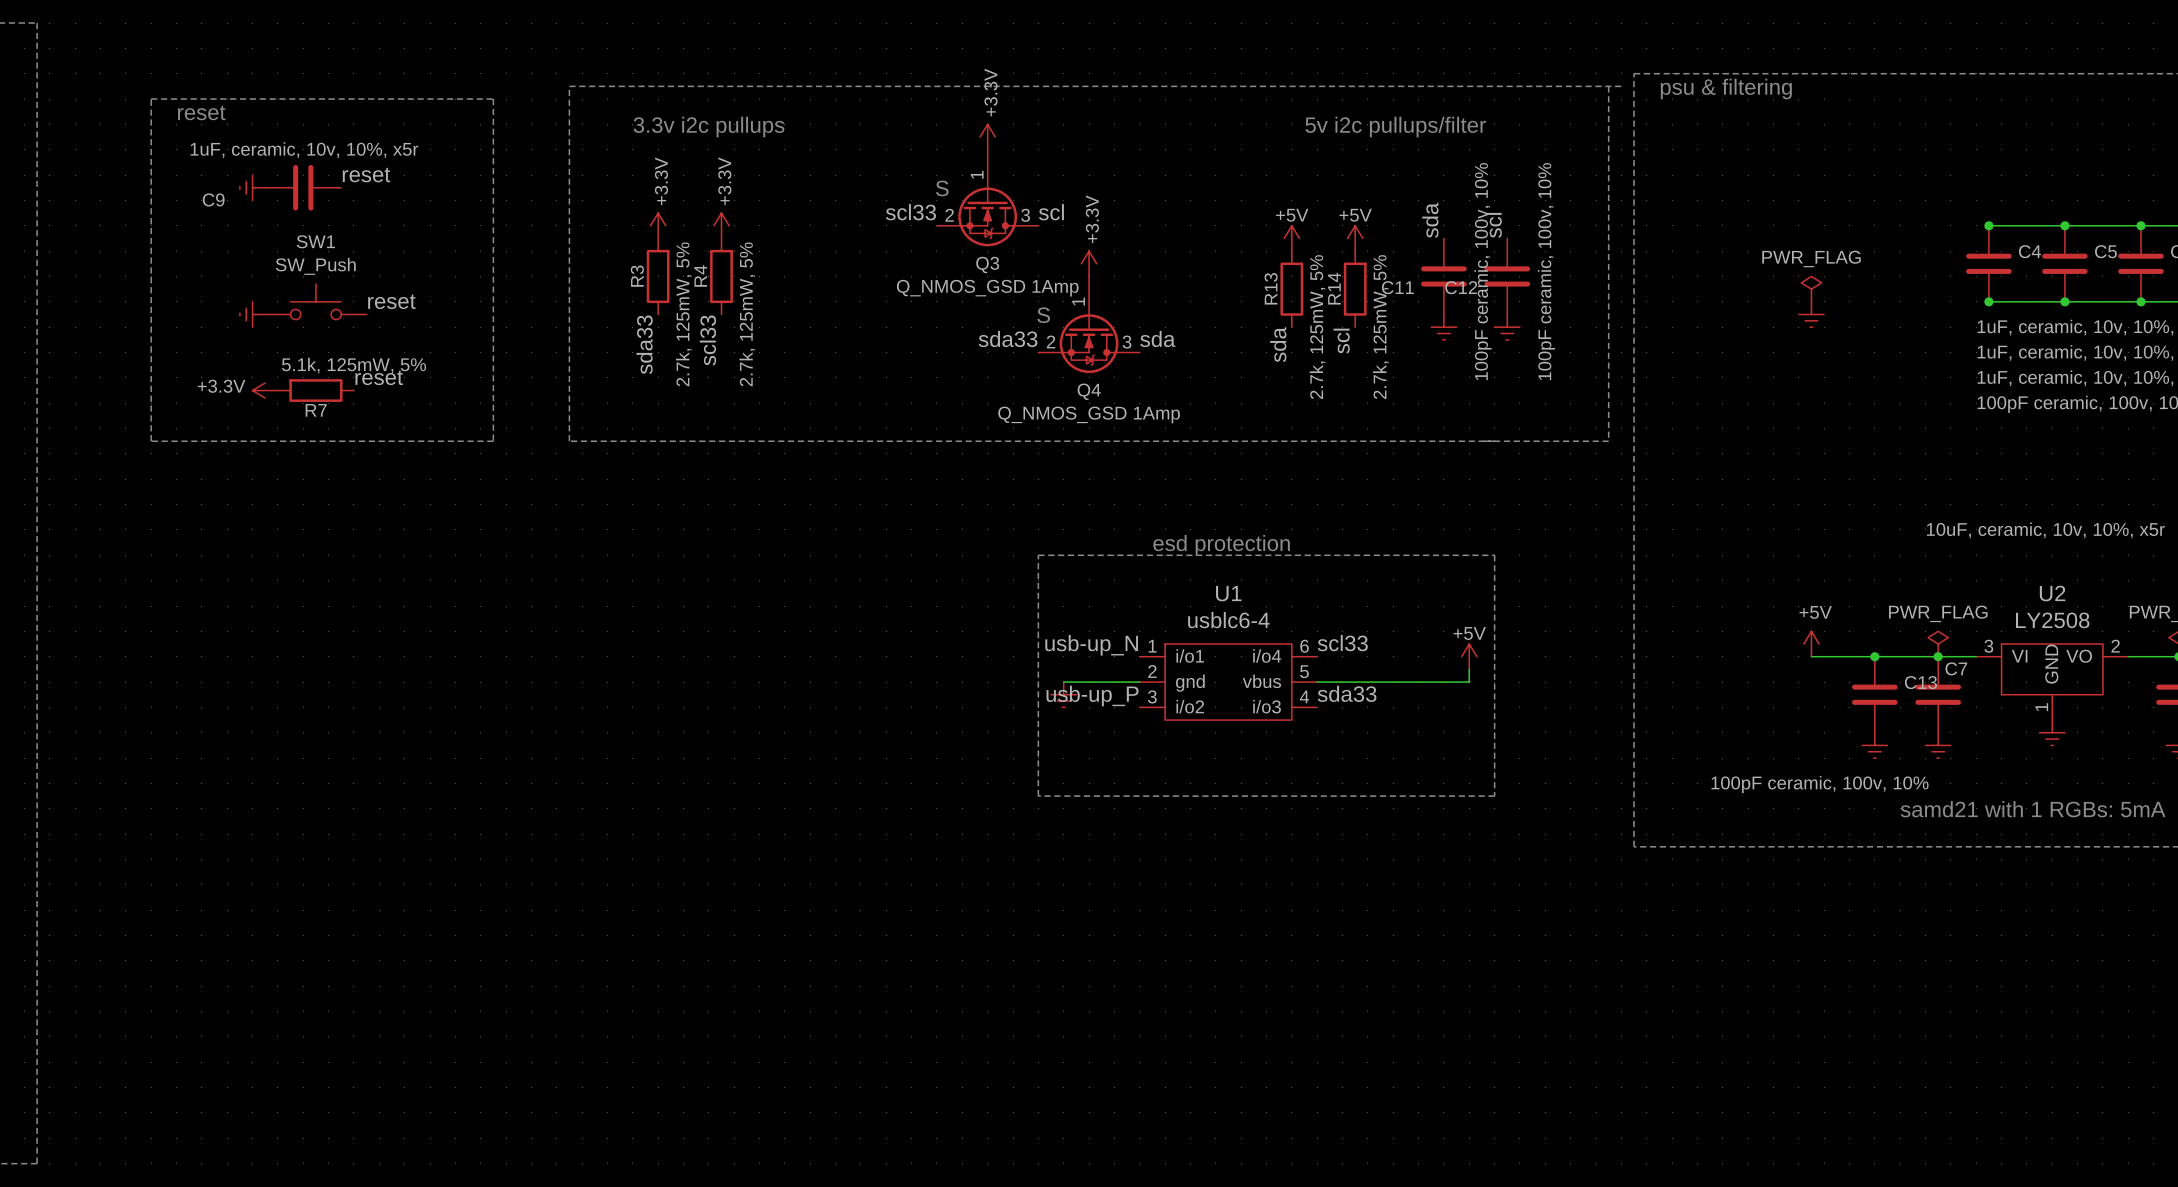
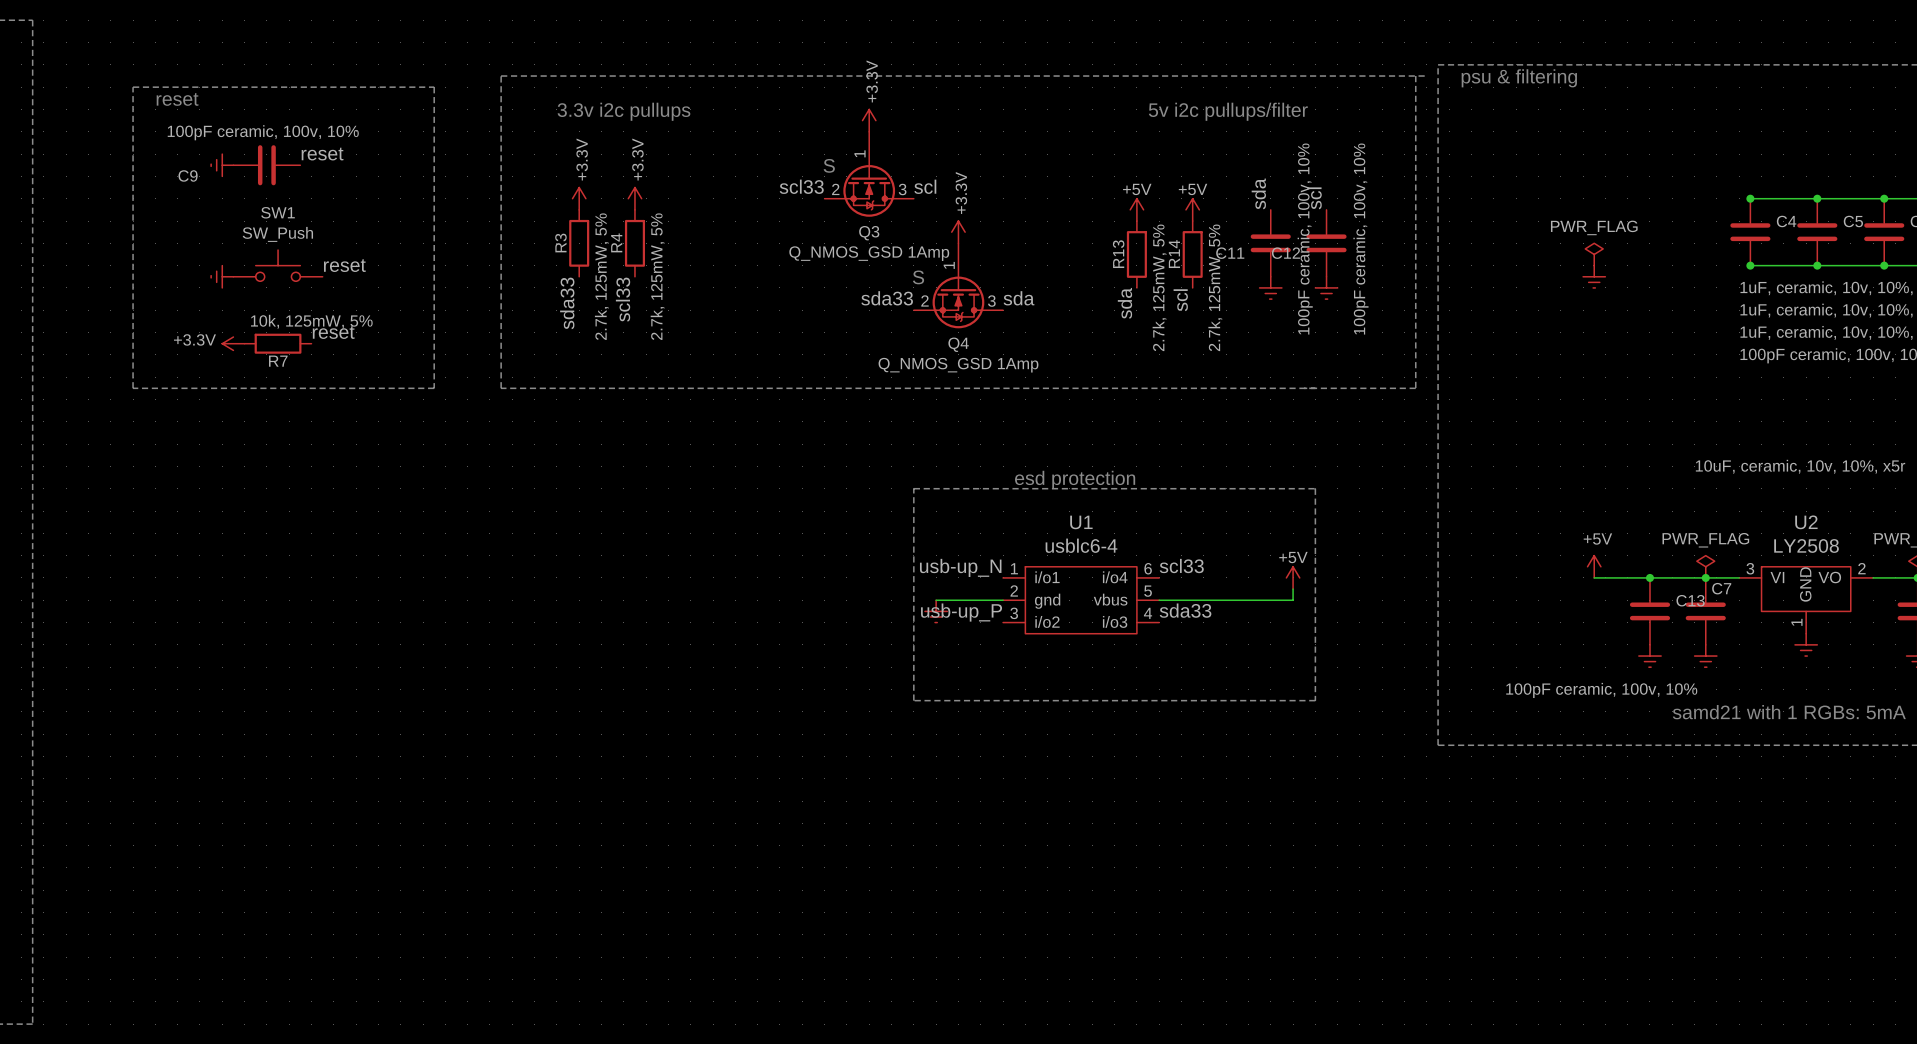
C9 value: 1uF, ceramic, 10v, 10%, x5r (304, 150) -> 100pF ceramic, 100v, 10% (263, 132)
R7 value: 5.1k, 125mW, 5% (353, 365) -> 10k, 125mW, 5% (311, 321)

